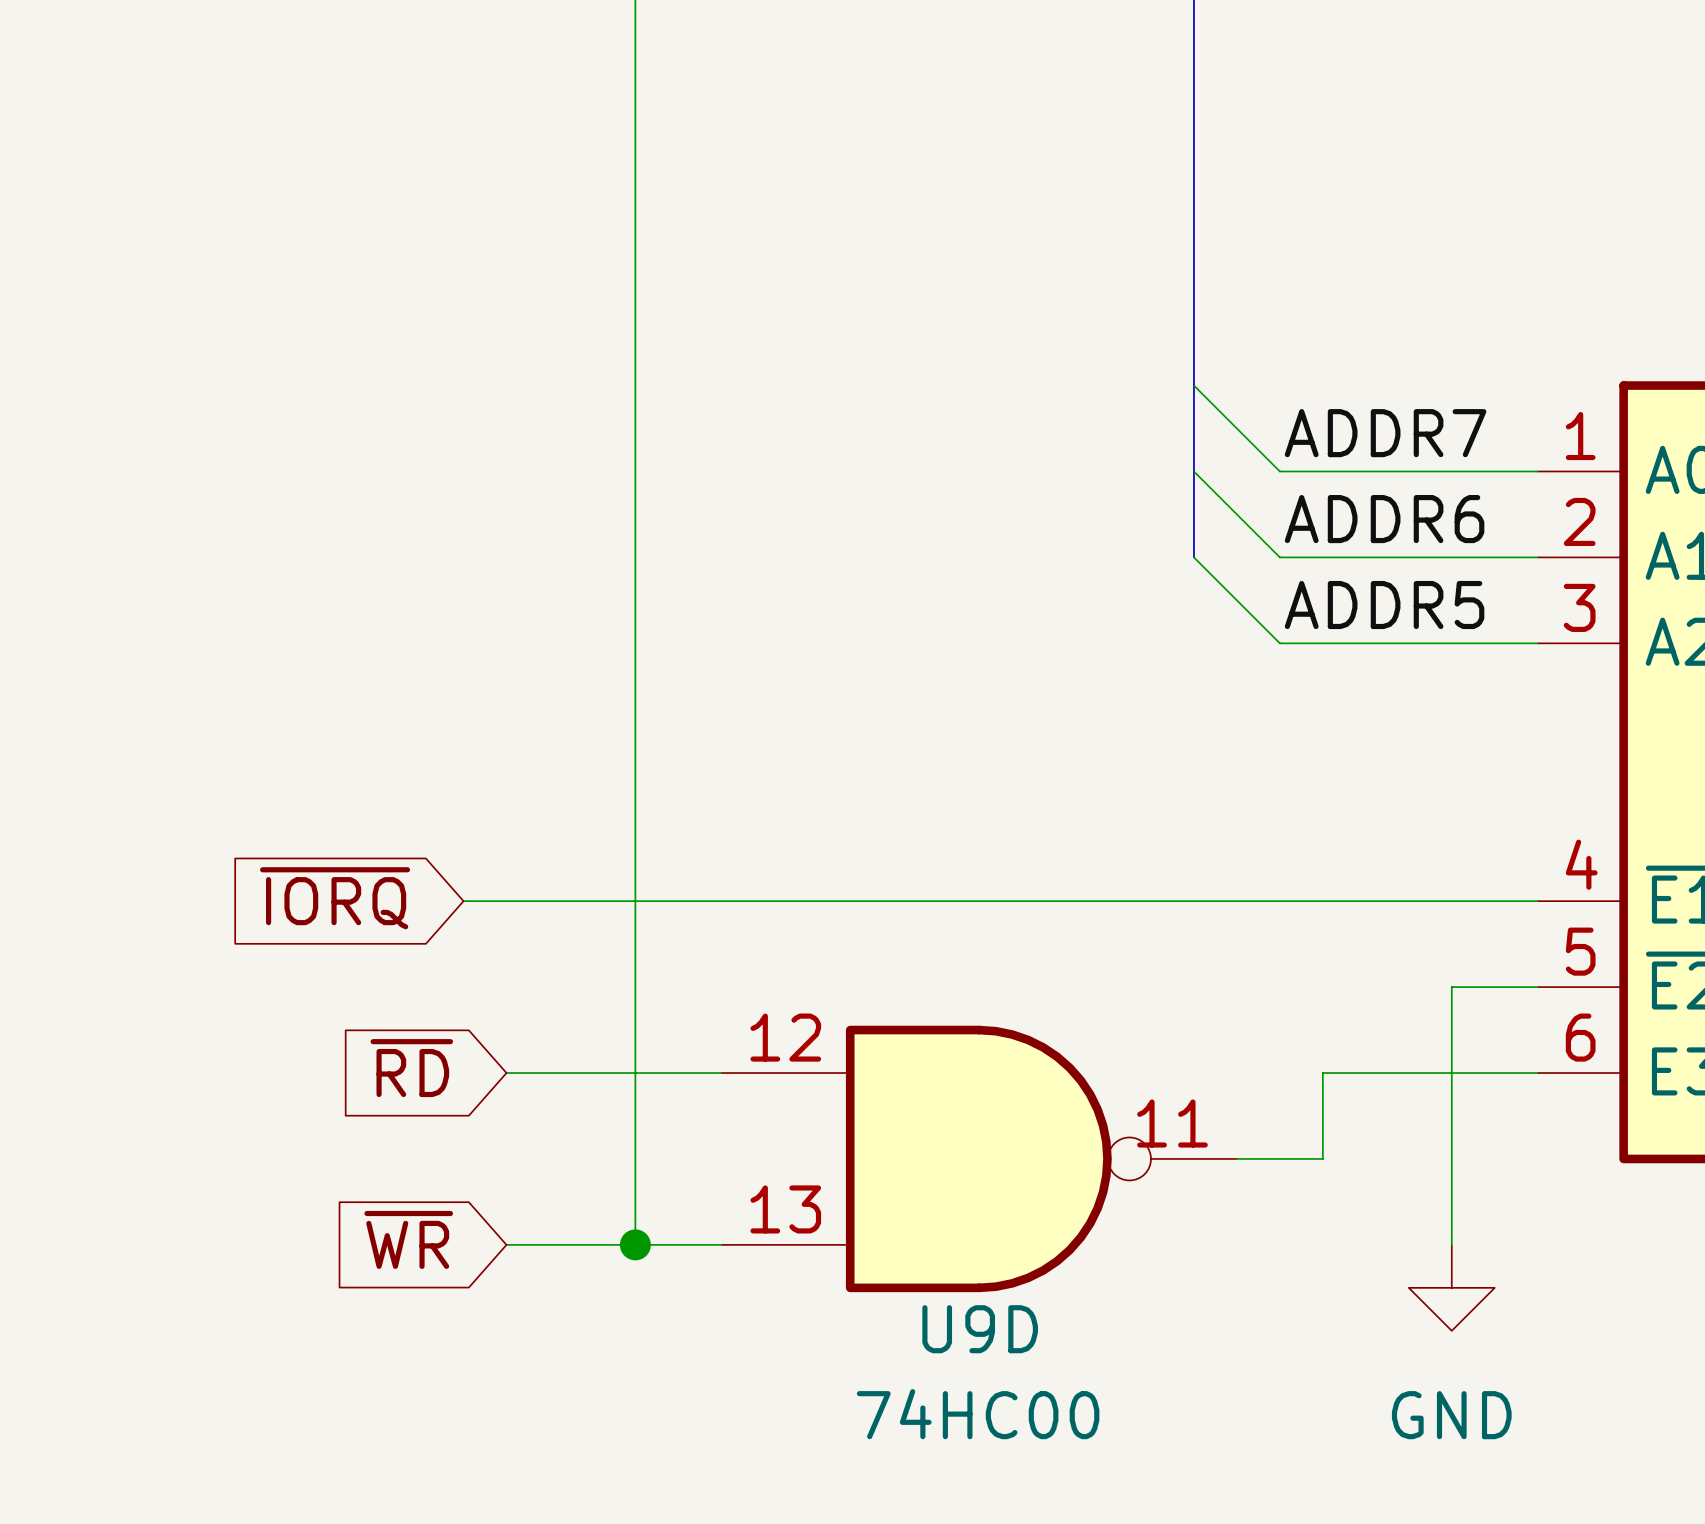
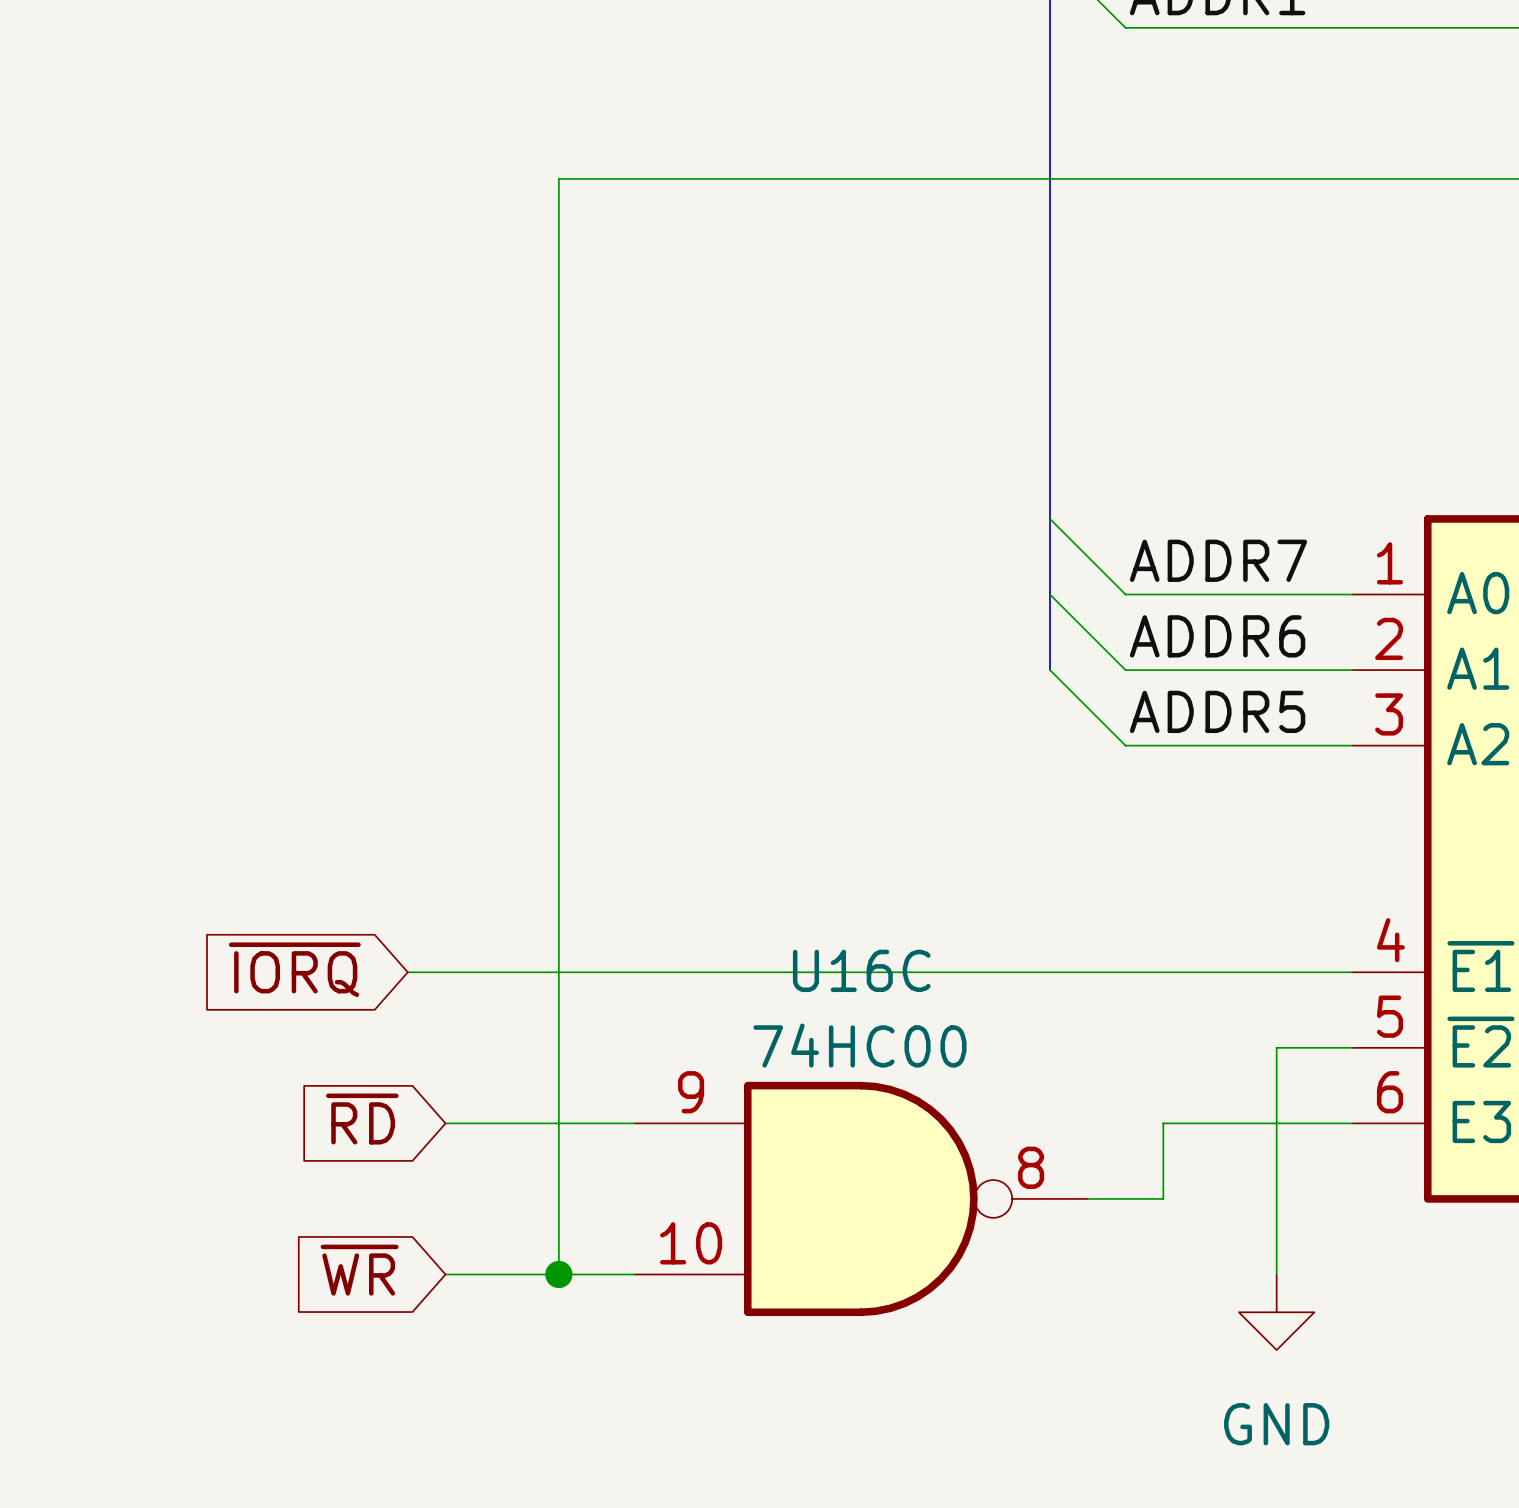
U9D pin number: 12 (785, 1037) -> 9 (691, 1092)
U9D pin number: 11 (1172, 1123) -> 8 (1031, 1167)
U9D pin number: 13 (785, 1209) -> 10 (691, 1243)
U9D name: U9D (980, 1329) -> U16C (861, 970)
U9D value position: 74HC00 (978, 1414) -> 74HC00 (859, 1045)

